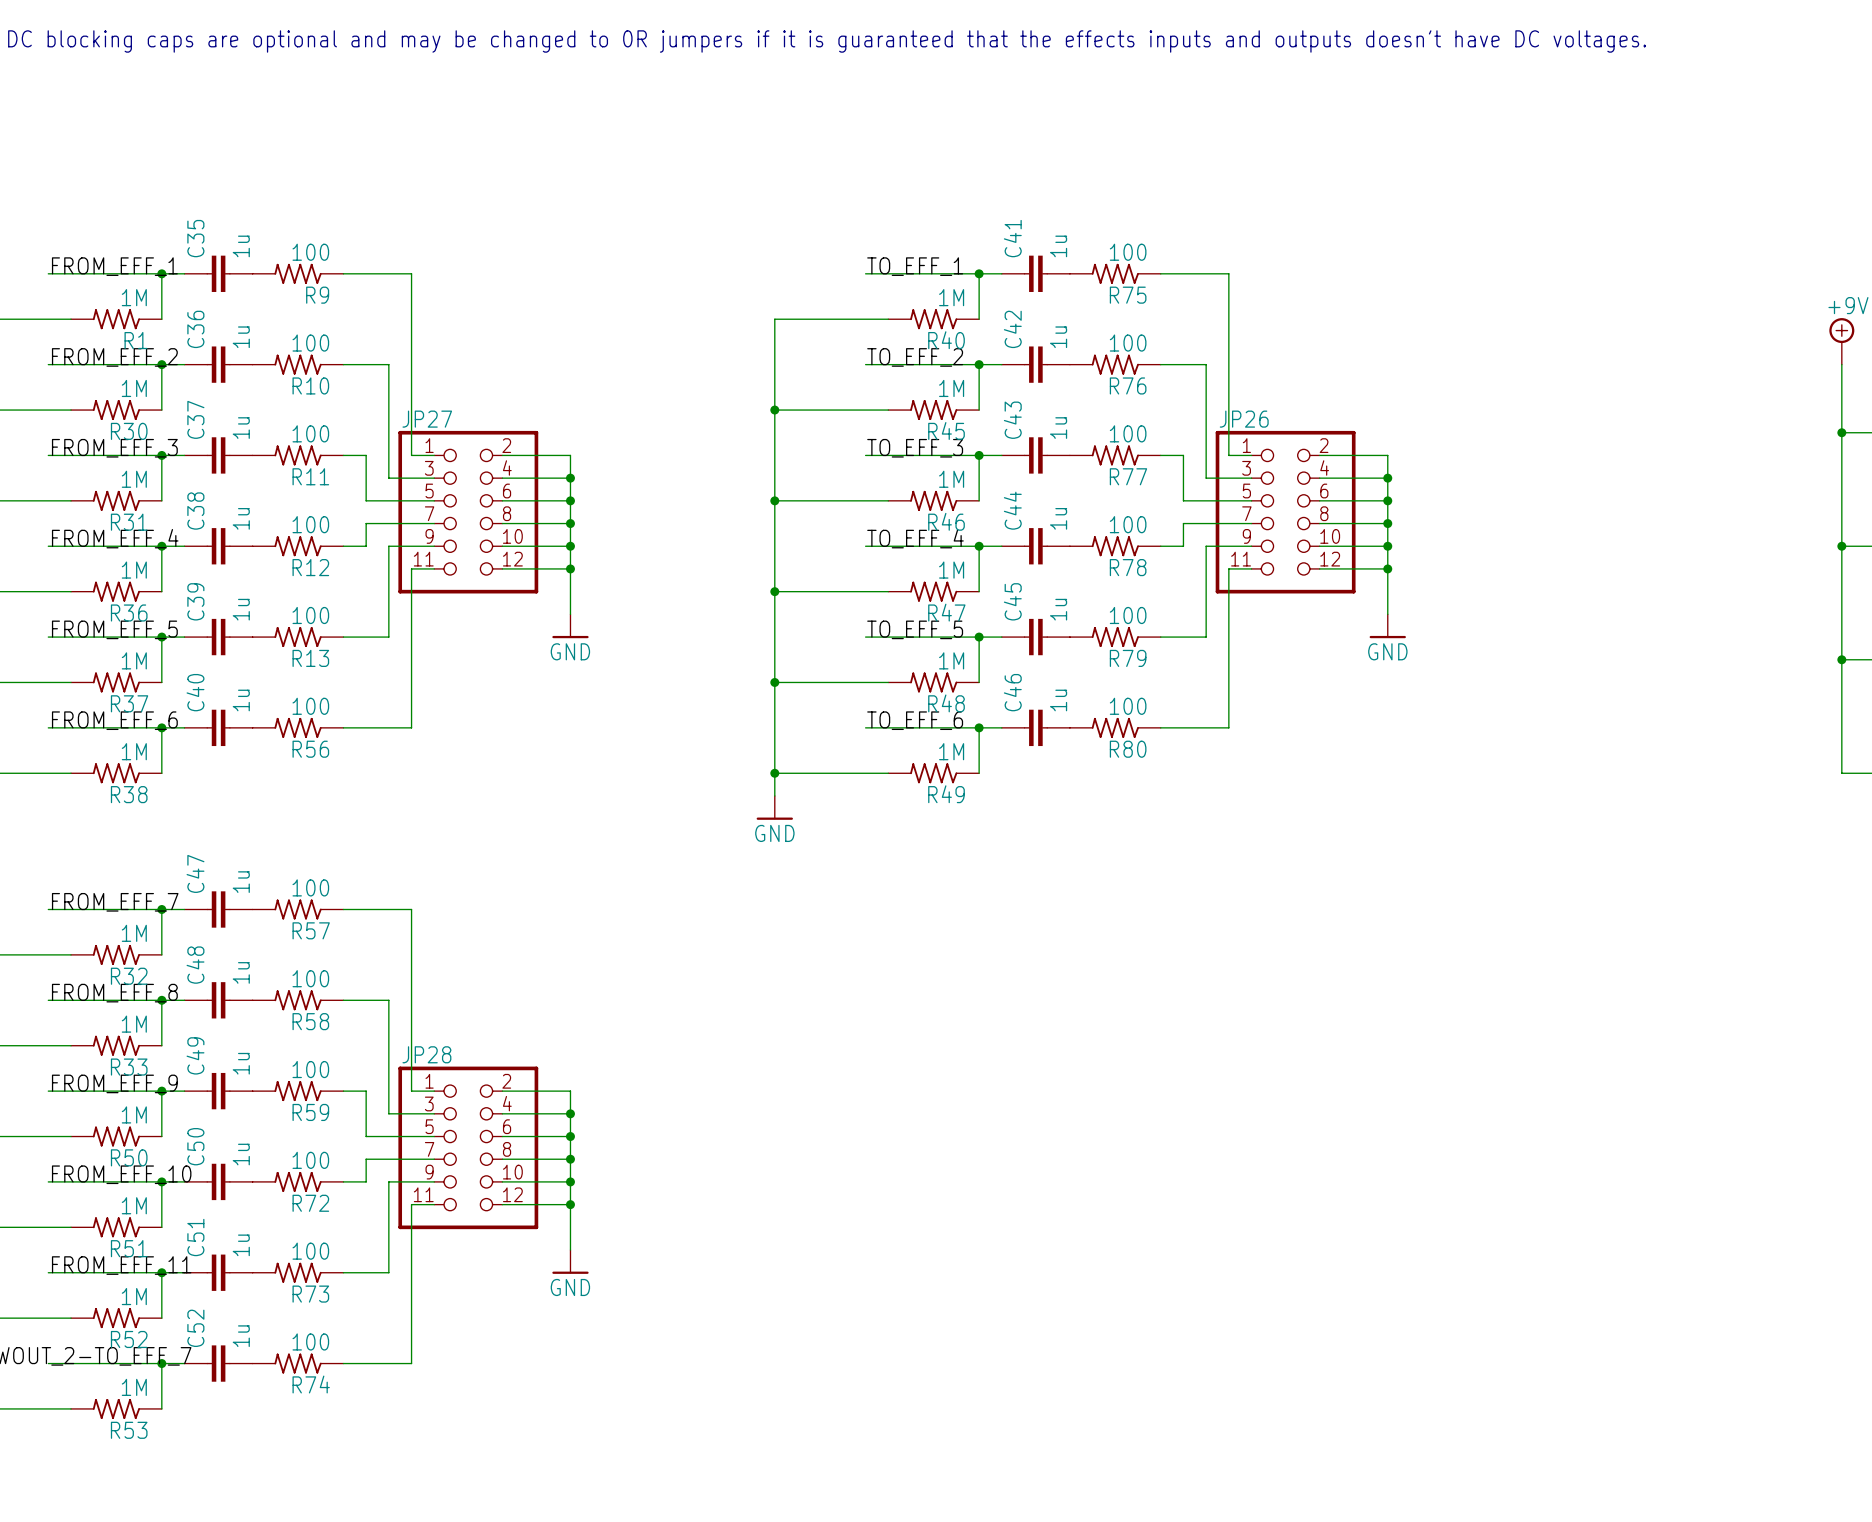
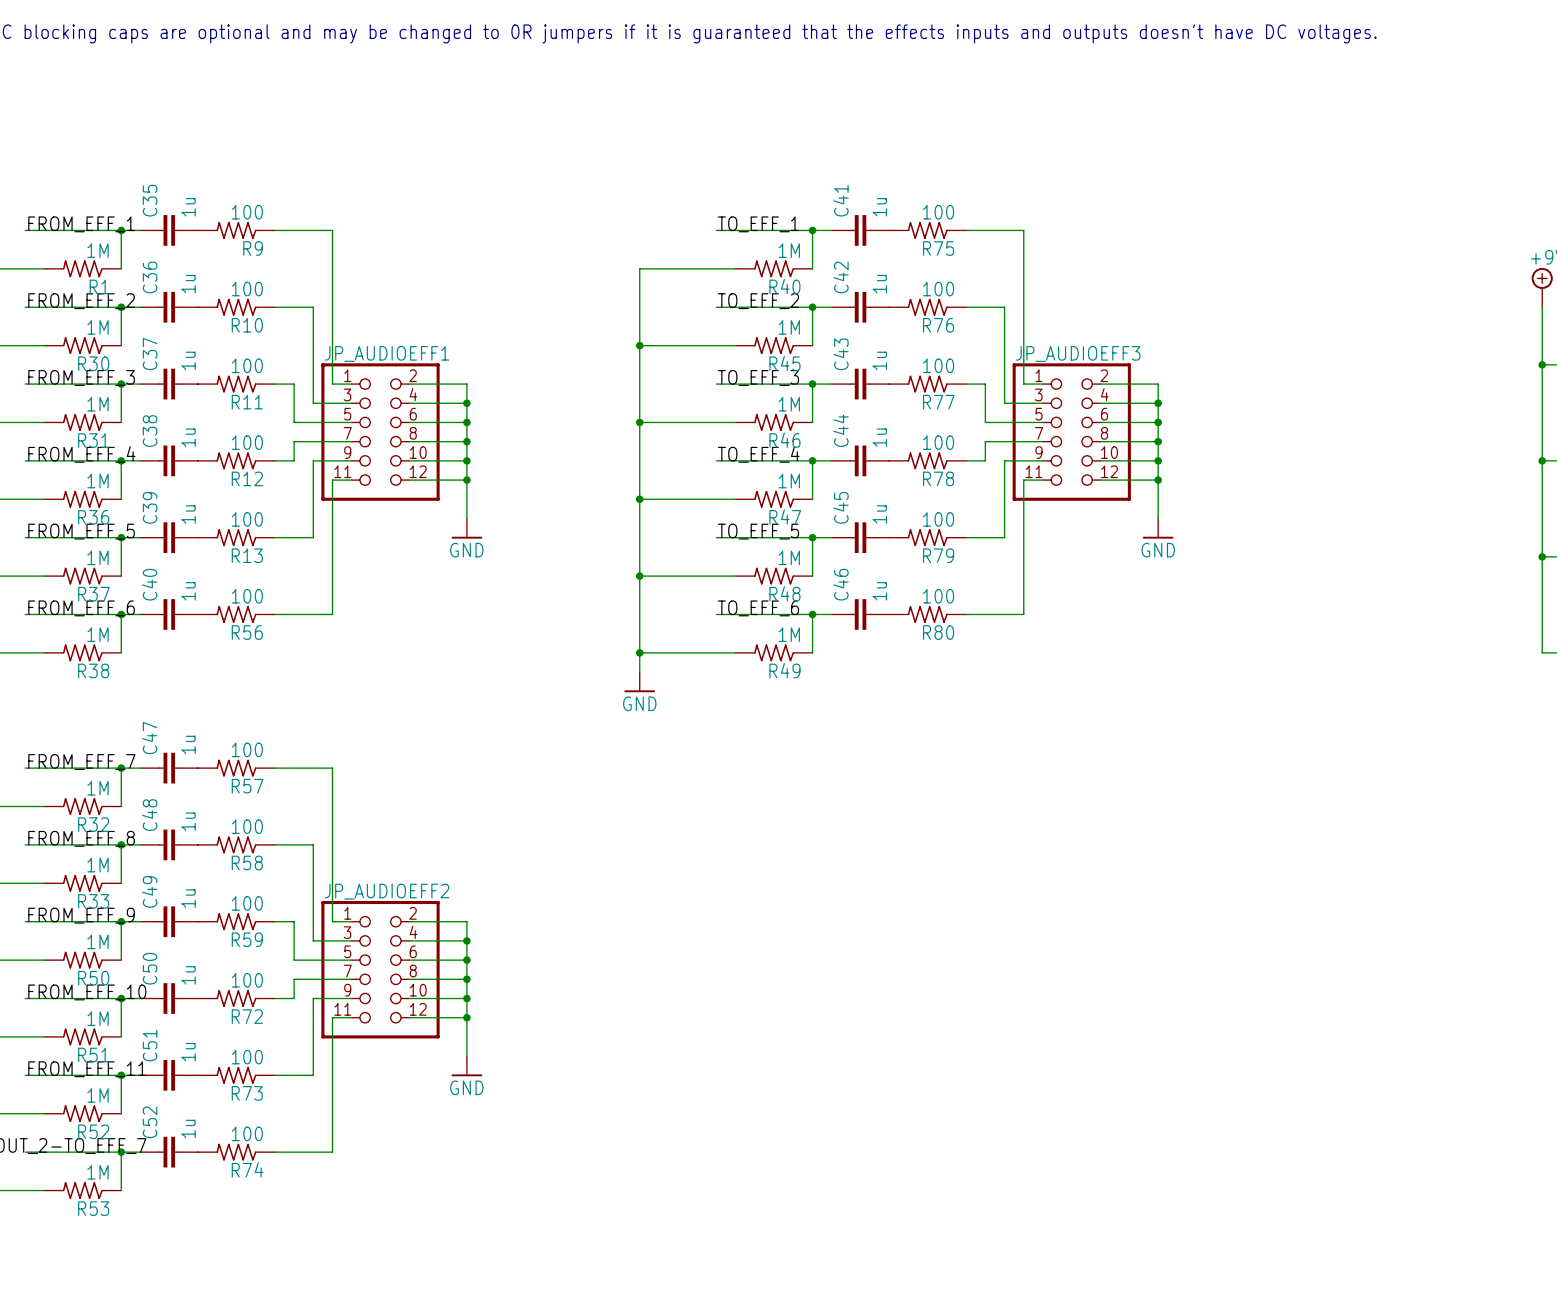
JP27 name: JP27 (427, 419) -> JP_AUDIOEFF1 (386, 353)
JP26 name: JP26 (1244, 419) -> JP_AUDIOEFF3 (1078, 353)
JP28 name: JP28 (426, 1054) -> JP_AUDIOEFF2 (386, 891)

